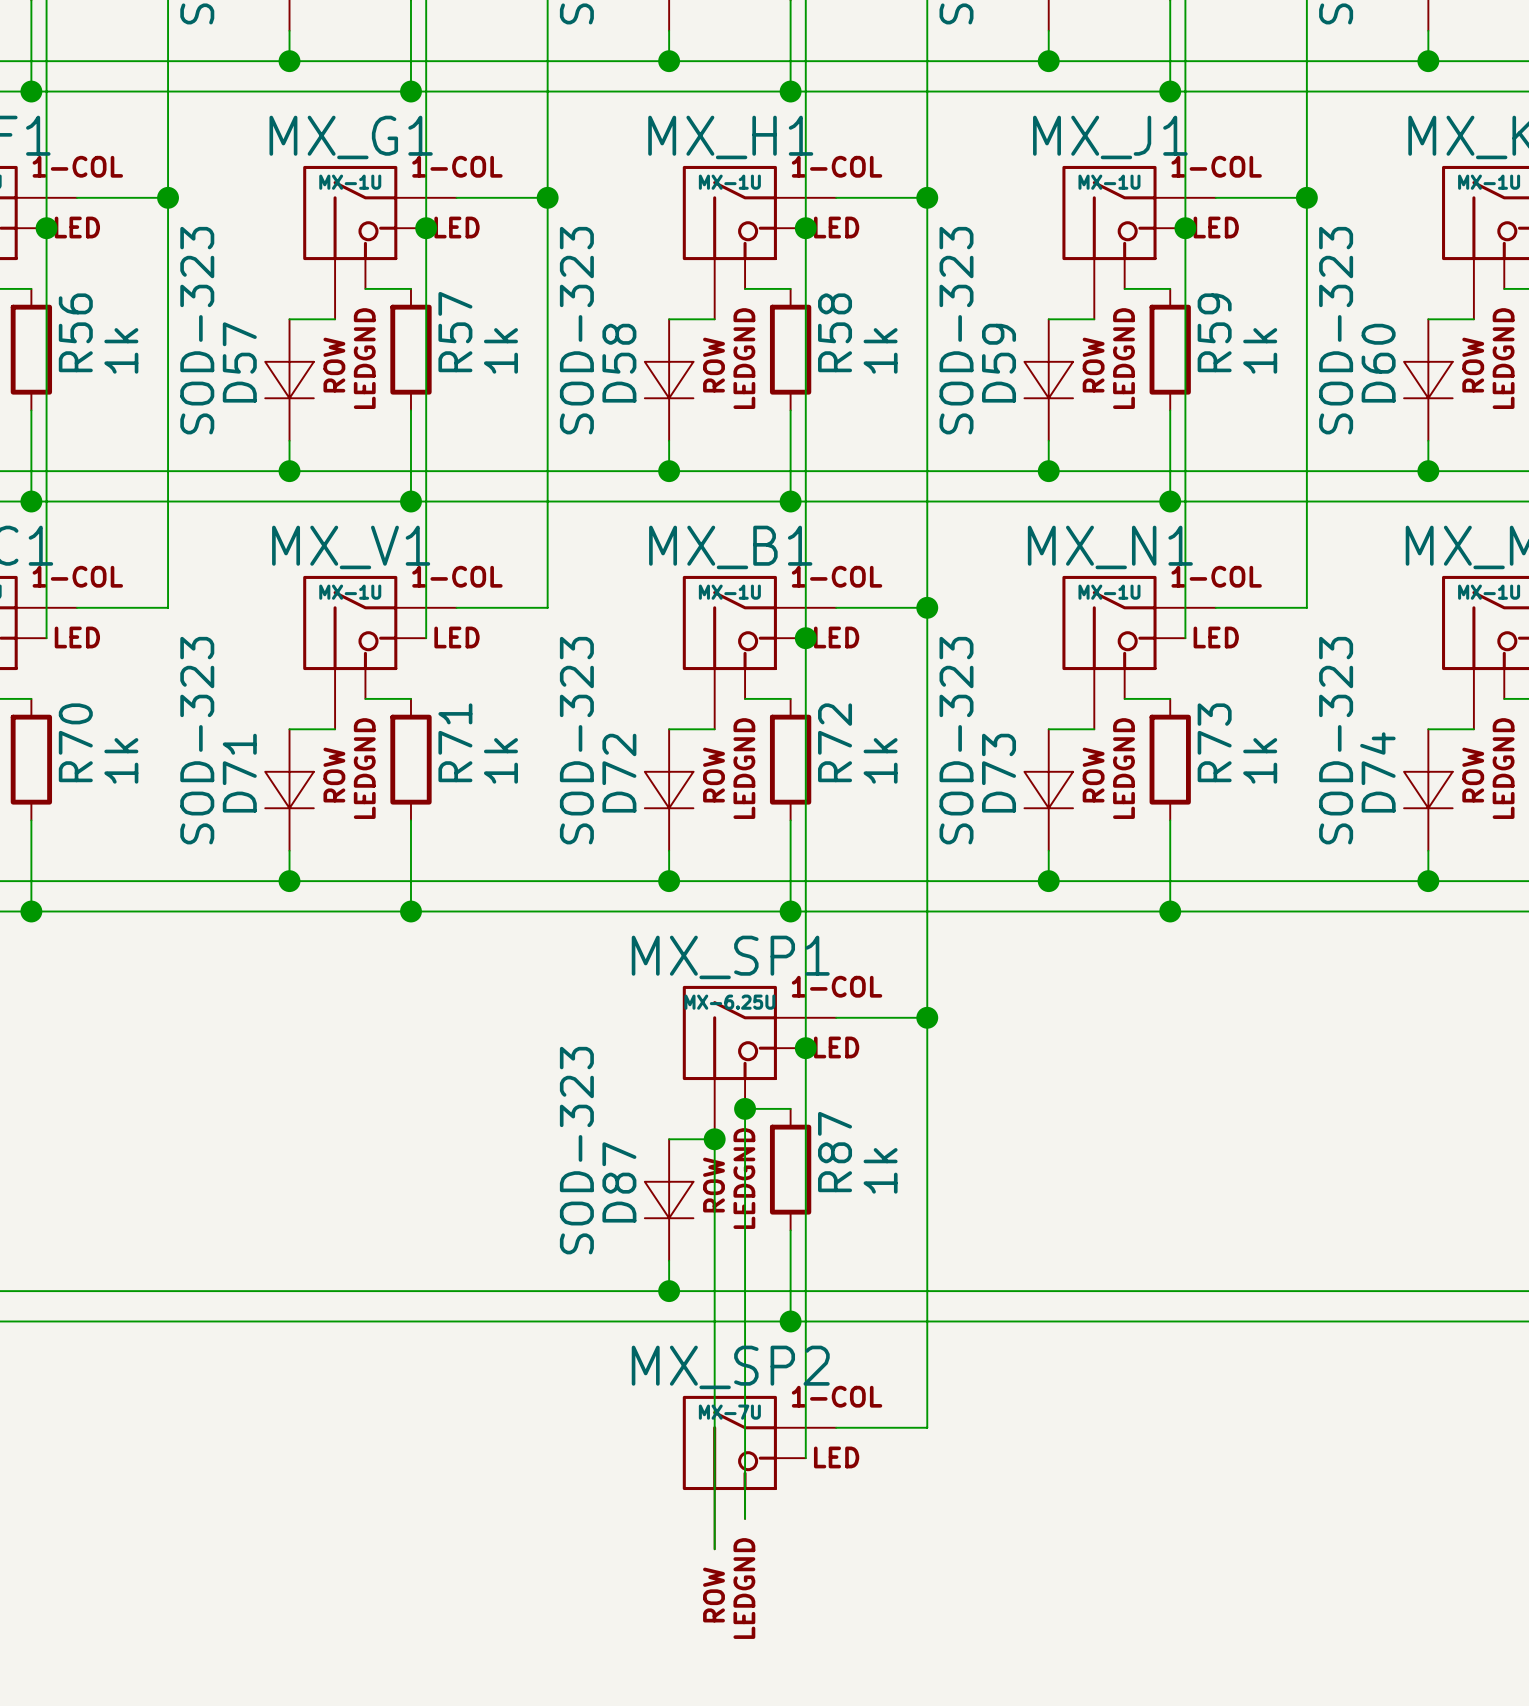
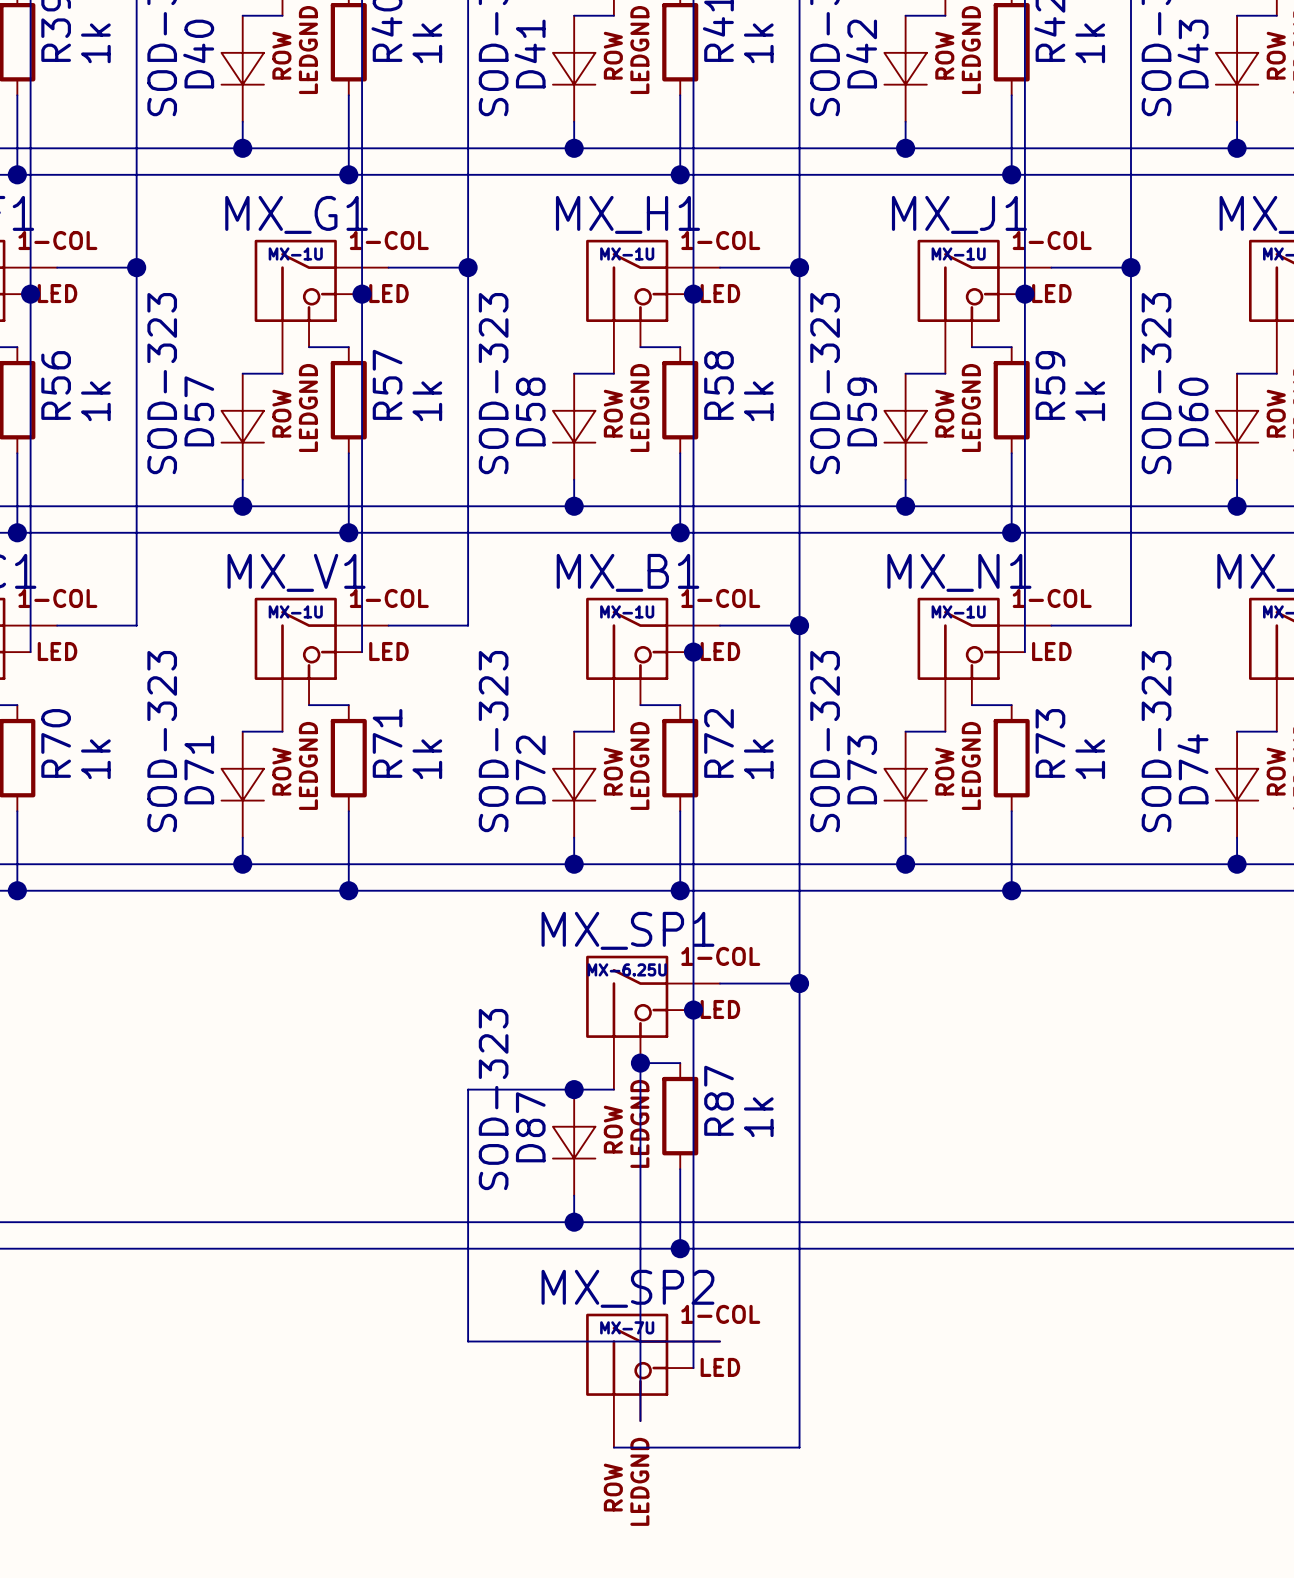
wire: none -> (574, 1089) (468, 1089) (468, 1341) (720, 1341)
wire: (714, 1139) (714, 1549) -> none
junction position: (714, 1139) -> (574, 1089)
wire: (836, 1427) (927, 1427) -> (613, 1447) (799, 1447) (799, 1341)

